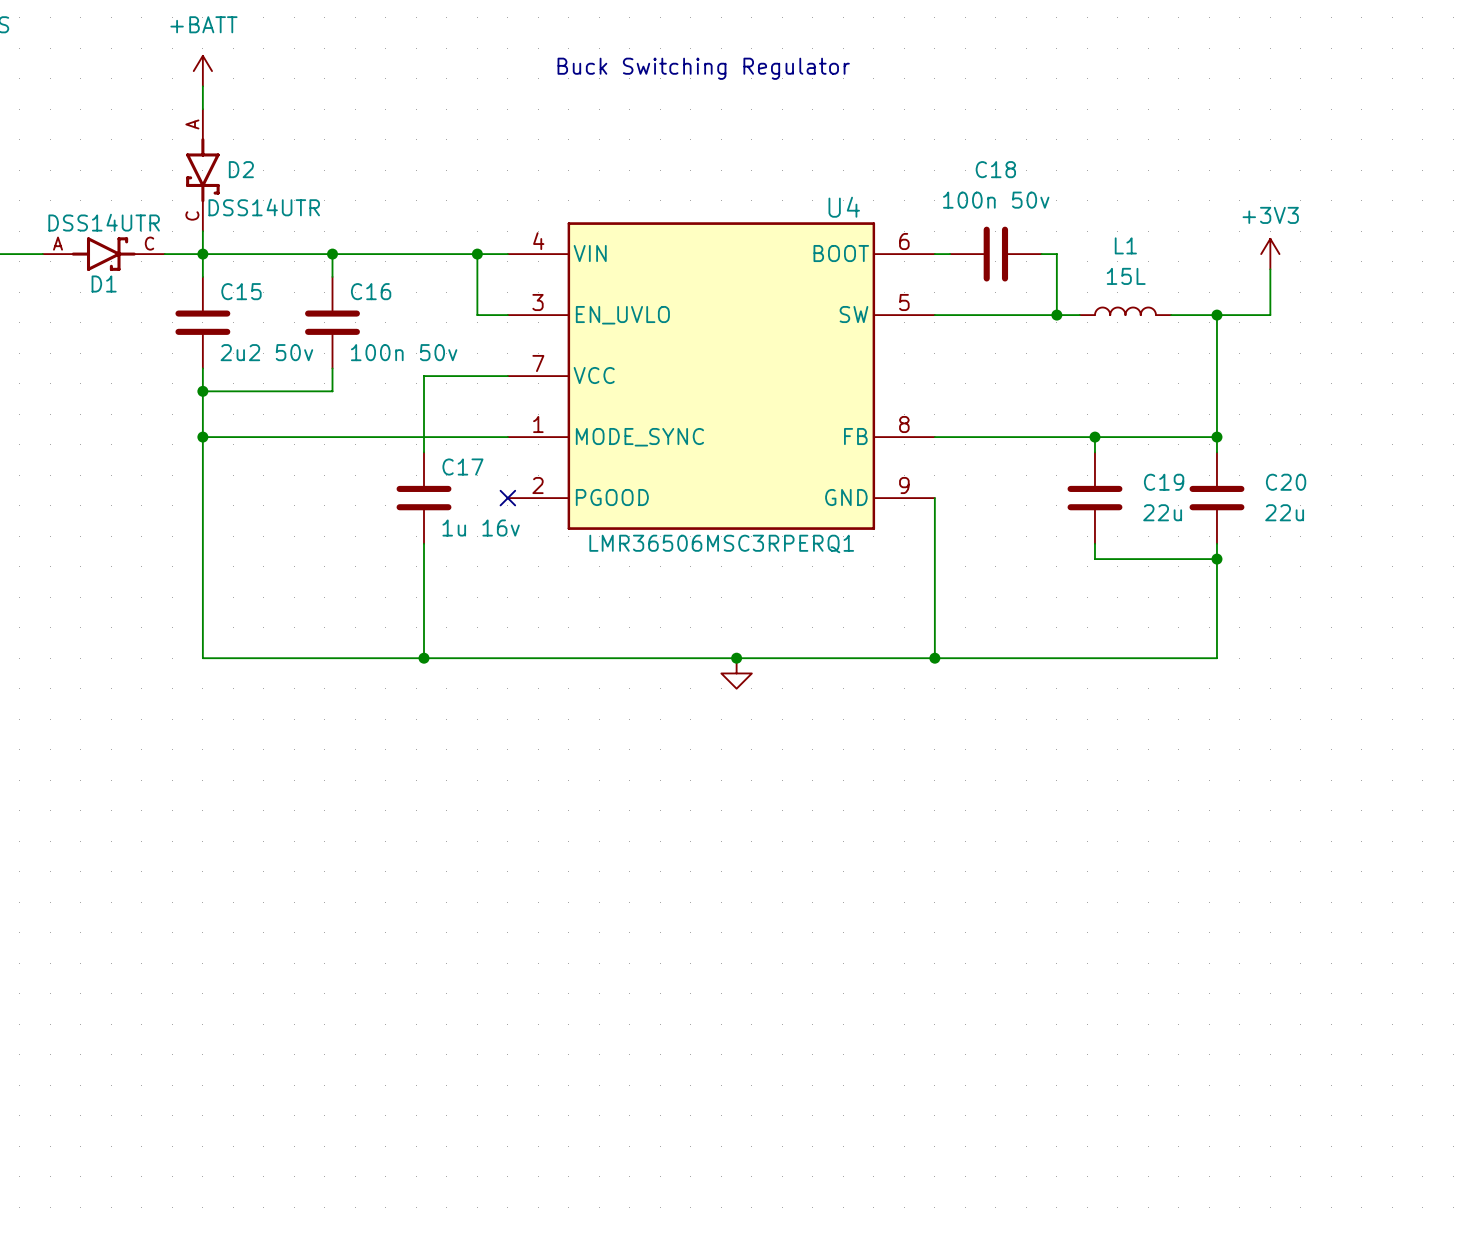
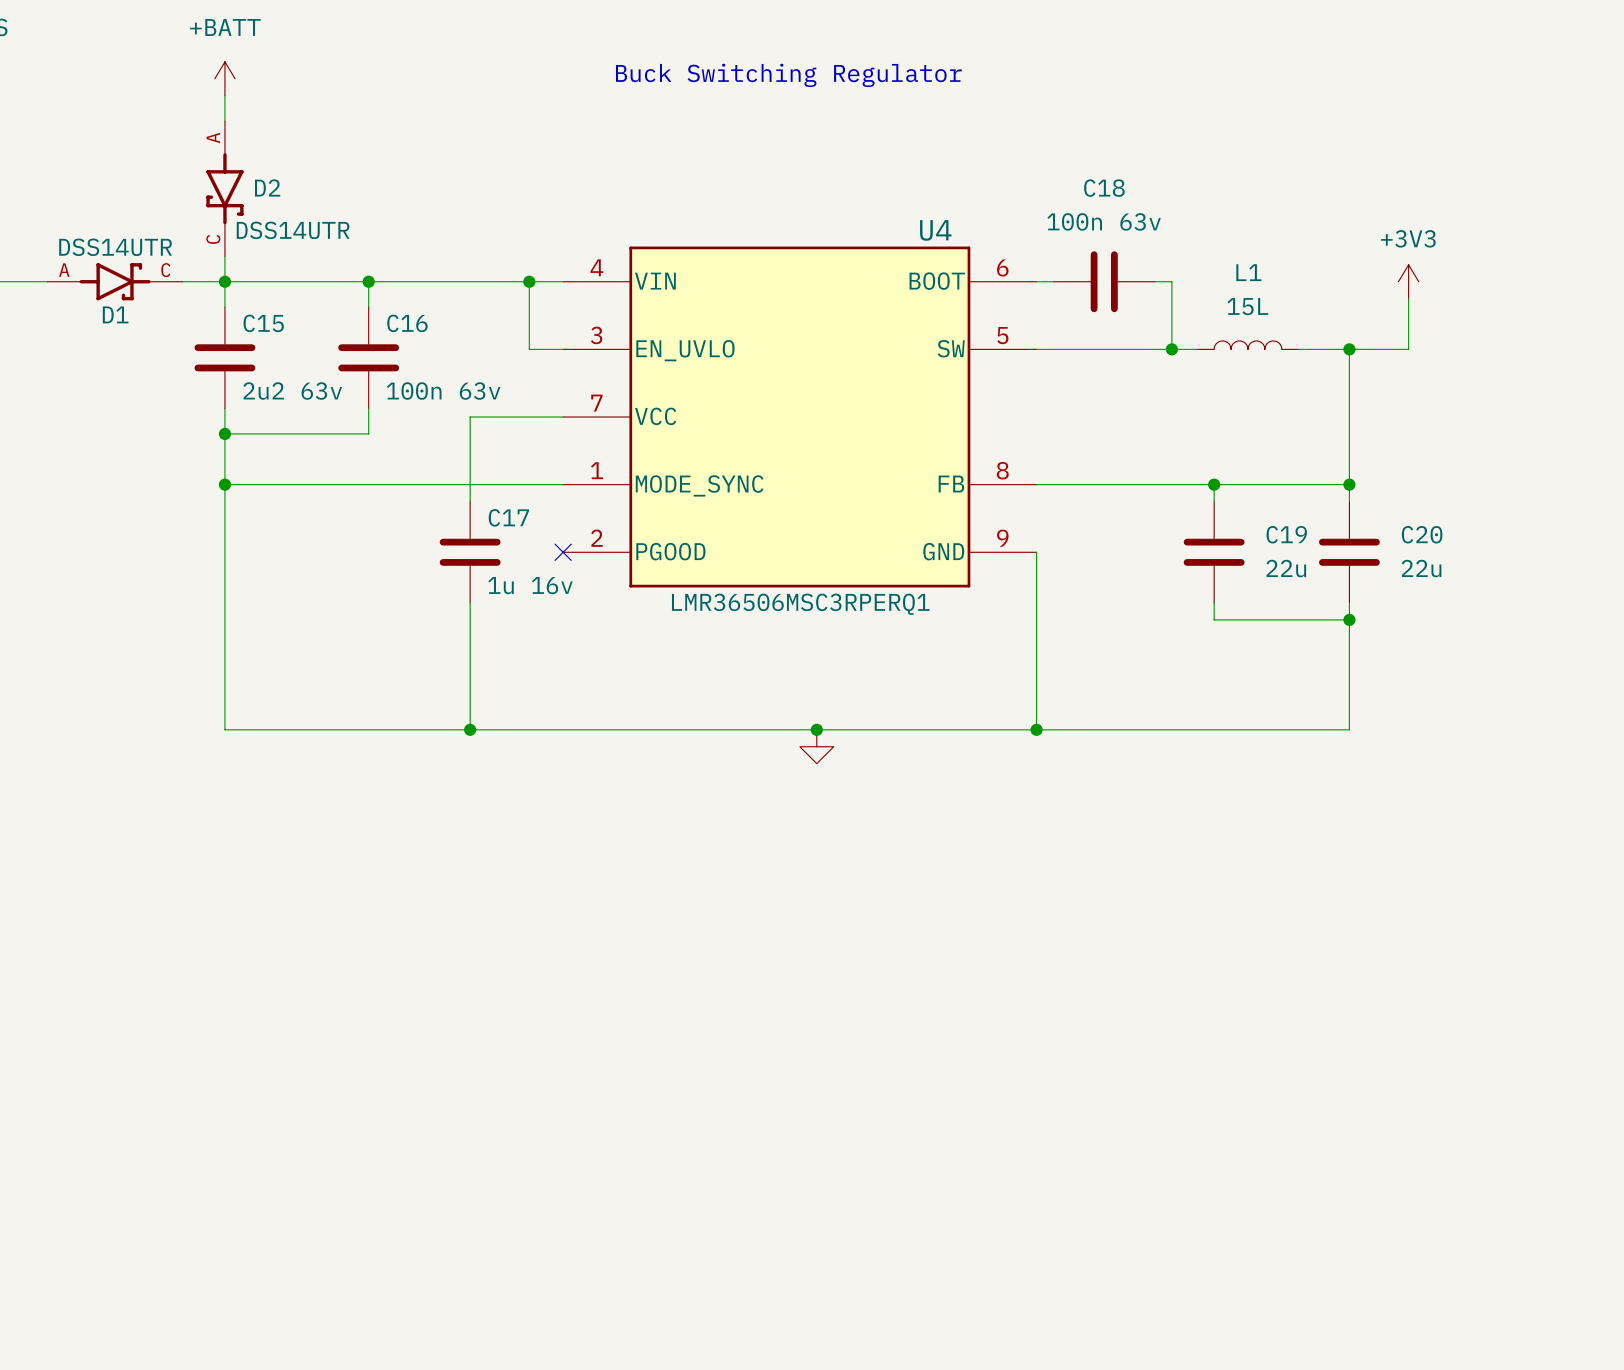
C18 value: 100n 50v (996, 200) -> 100n 63v (1104, 221)
C15 value: 2u2 50v (266, 352) -> 2u2 63v (292, 391)
C16 value: 100n 50v (404, 352) -> 100n 63v (443, 391)

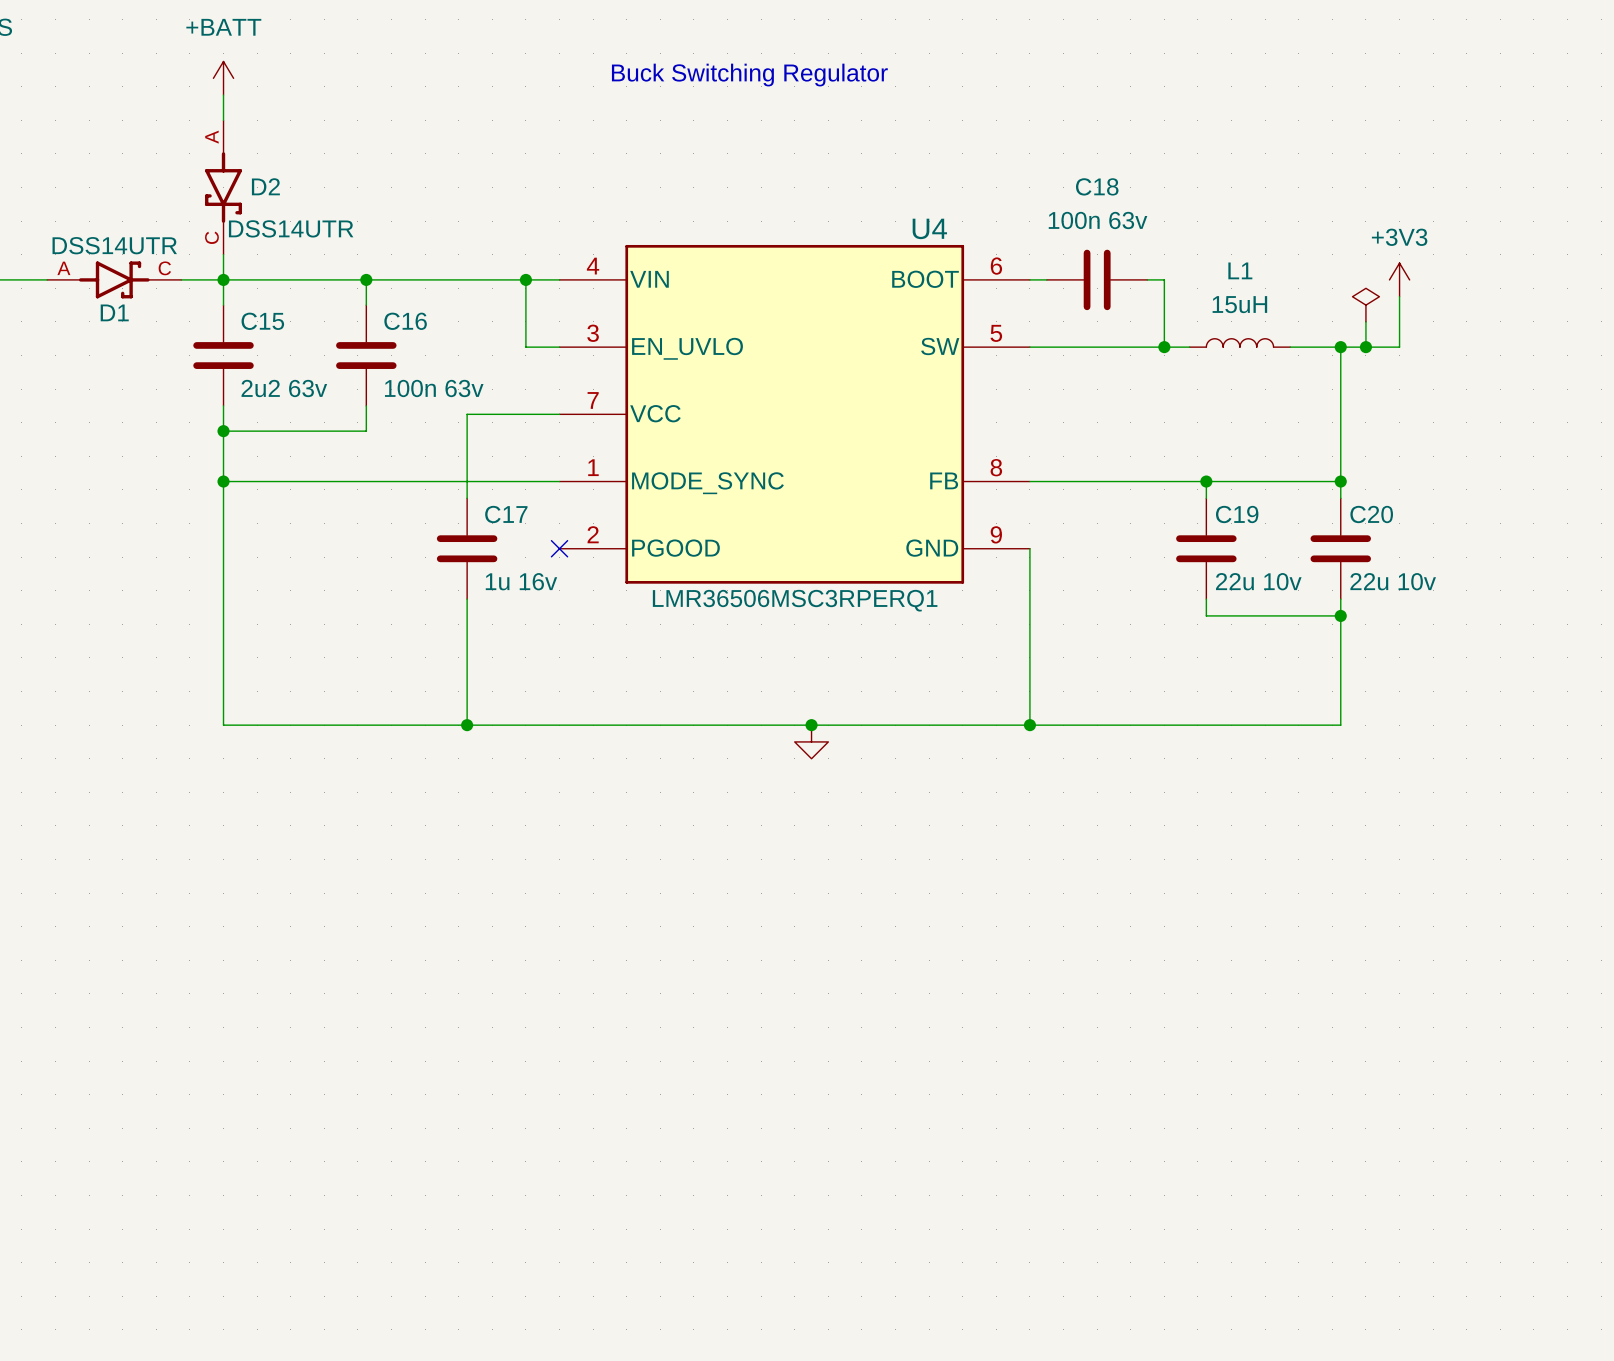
L1 value: 15L (1247, 306) -> 15uH (1239, 304)
power symbol: none -> (1365, 305)
wire: none -> (1365, 321) (1365, 347)
junction: none -> (1365, 347)
C19 name position: C19 (1286, 534) -> C19 (1237, 514)
C20 name position: C20 (1422, 534) -> C20 (1371, 514)
C19 value: 22u (1286, 568) -> 22u 10v (1258, 581)
C20 value: 22u (1421, 568) -> 22u 10v (1393, 581)

